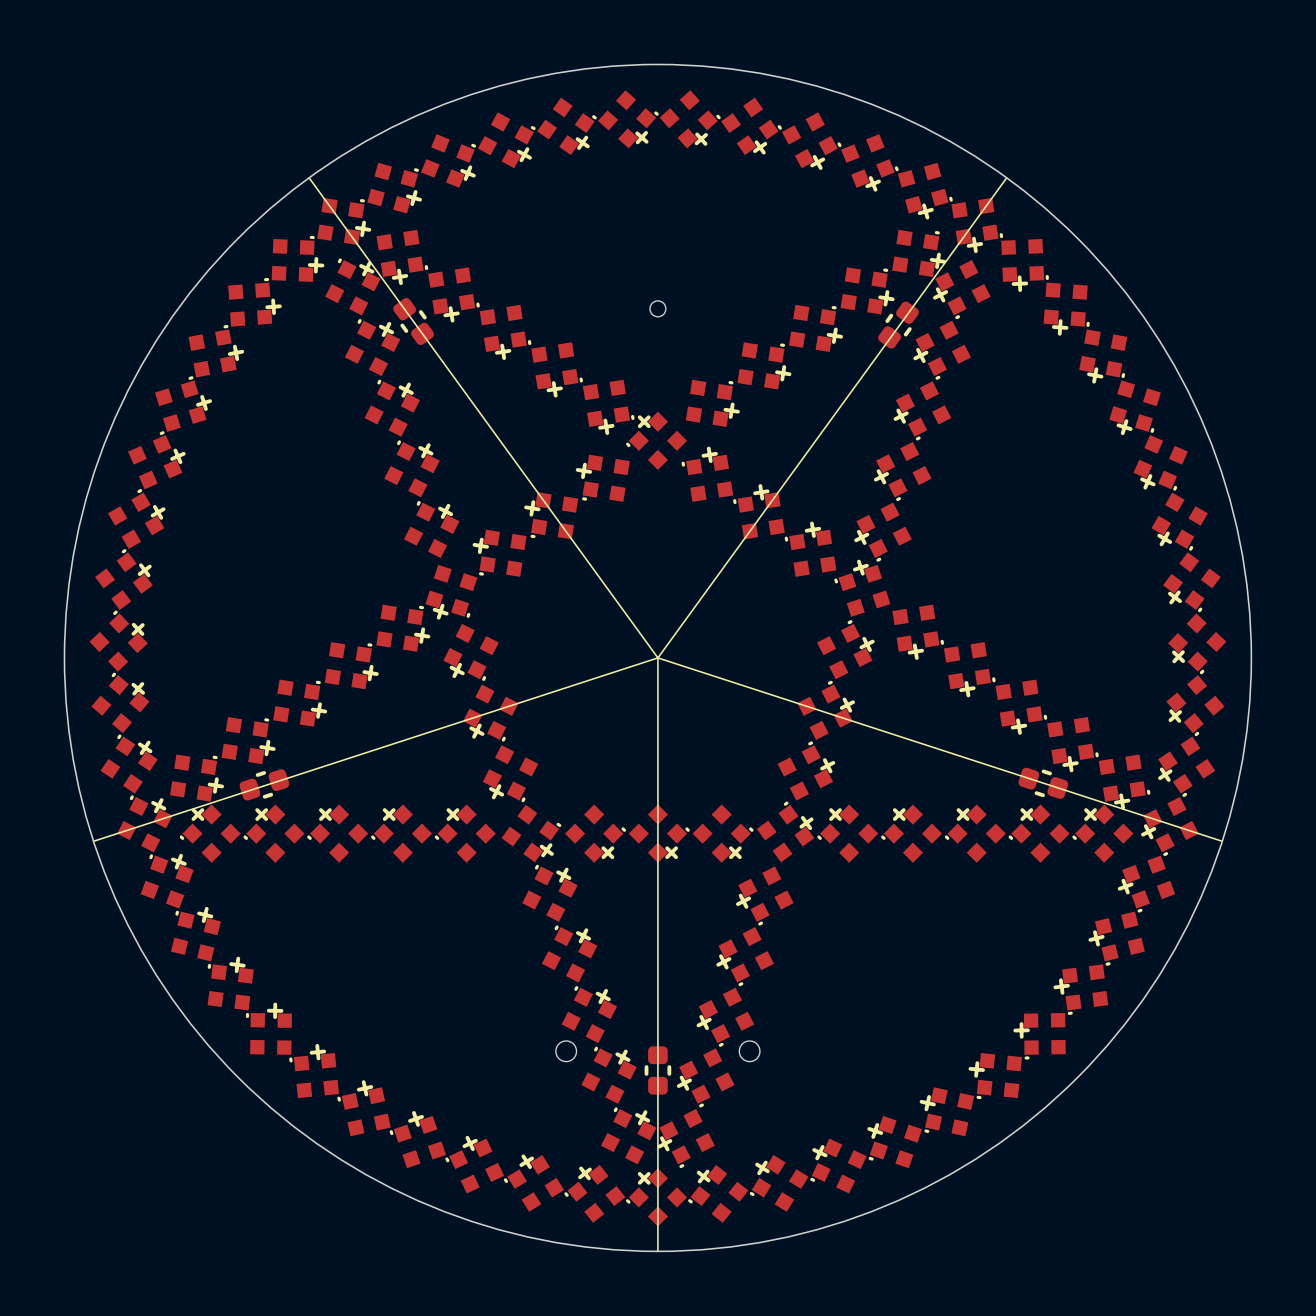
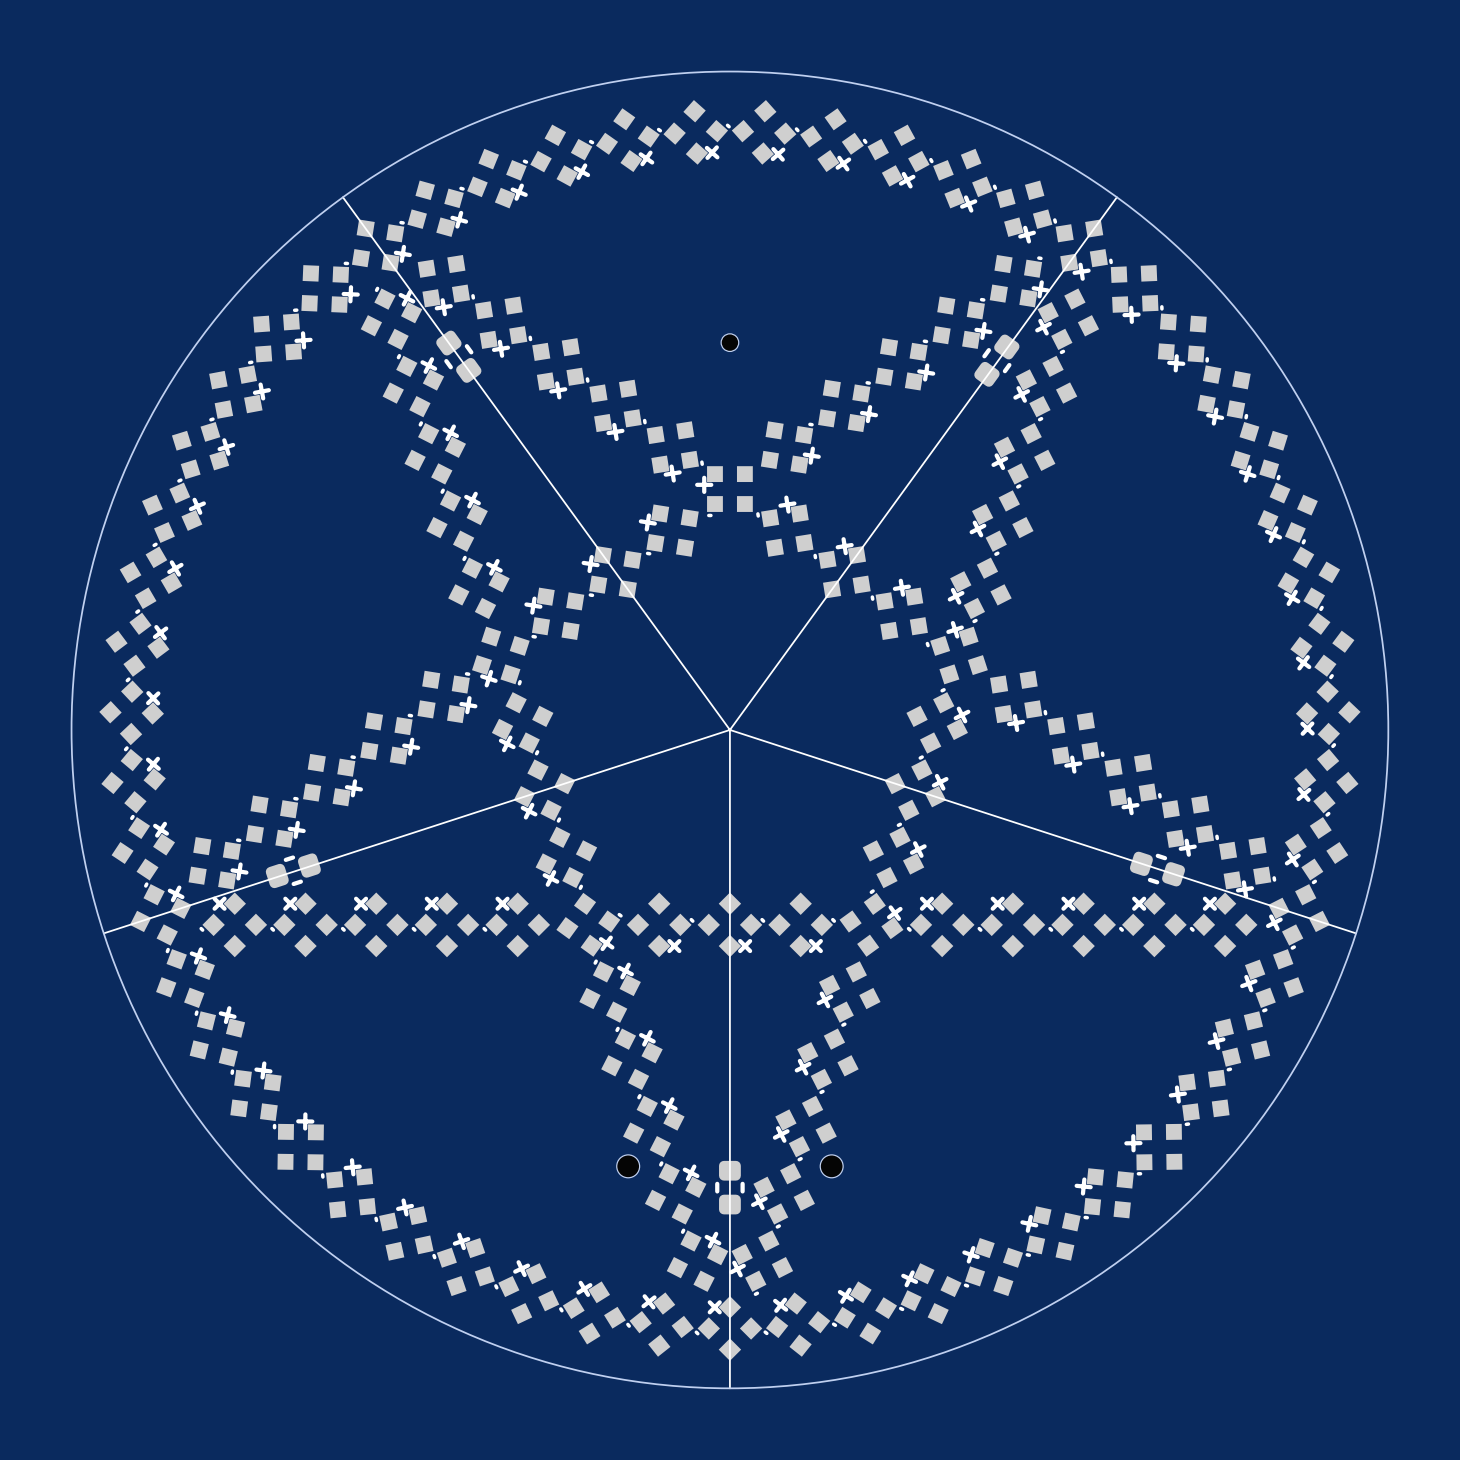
part rotation: 0° (656, 440) -> 45° counterclockwise (723, 491)

